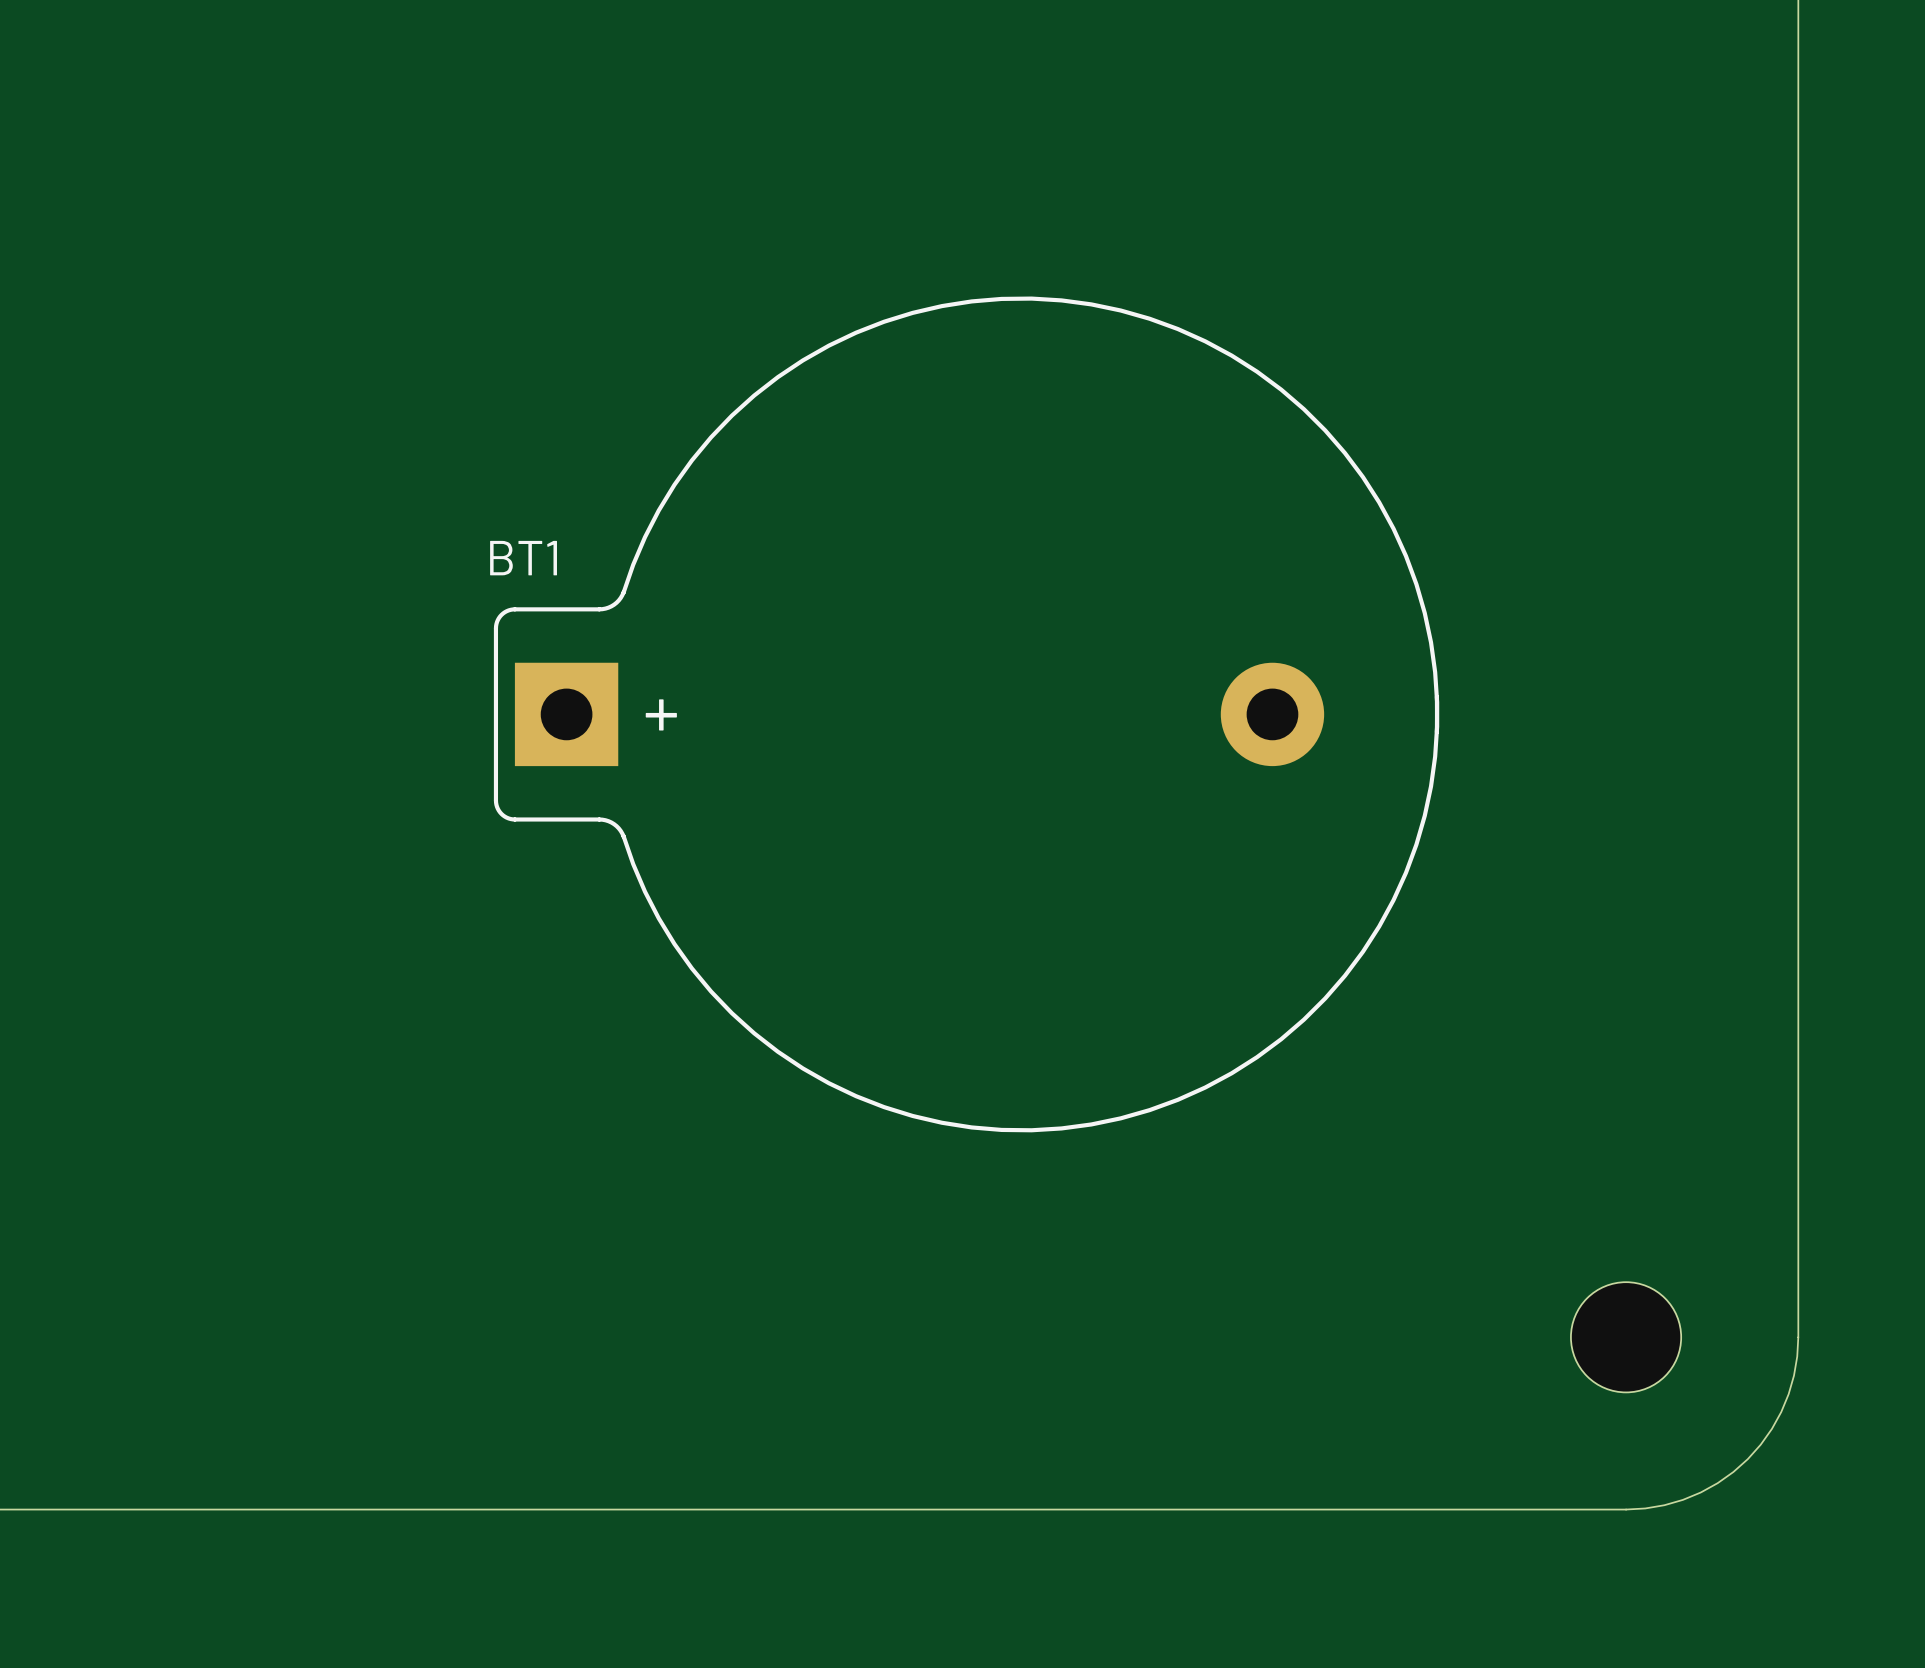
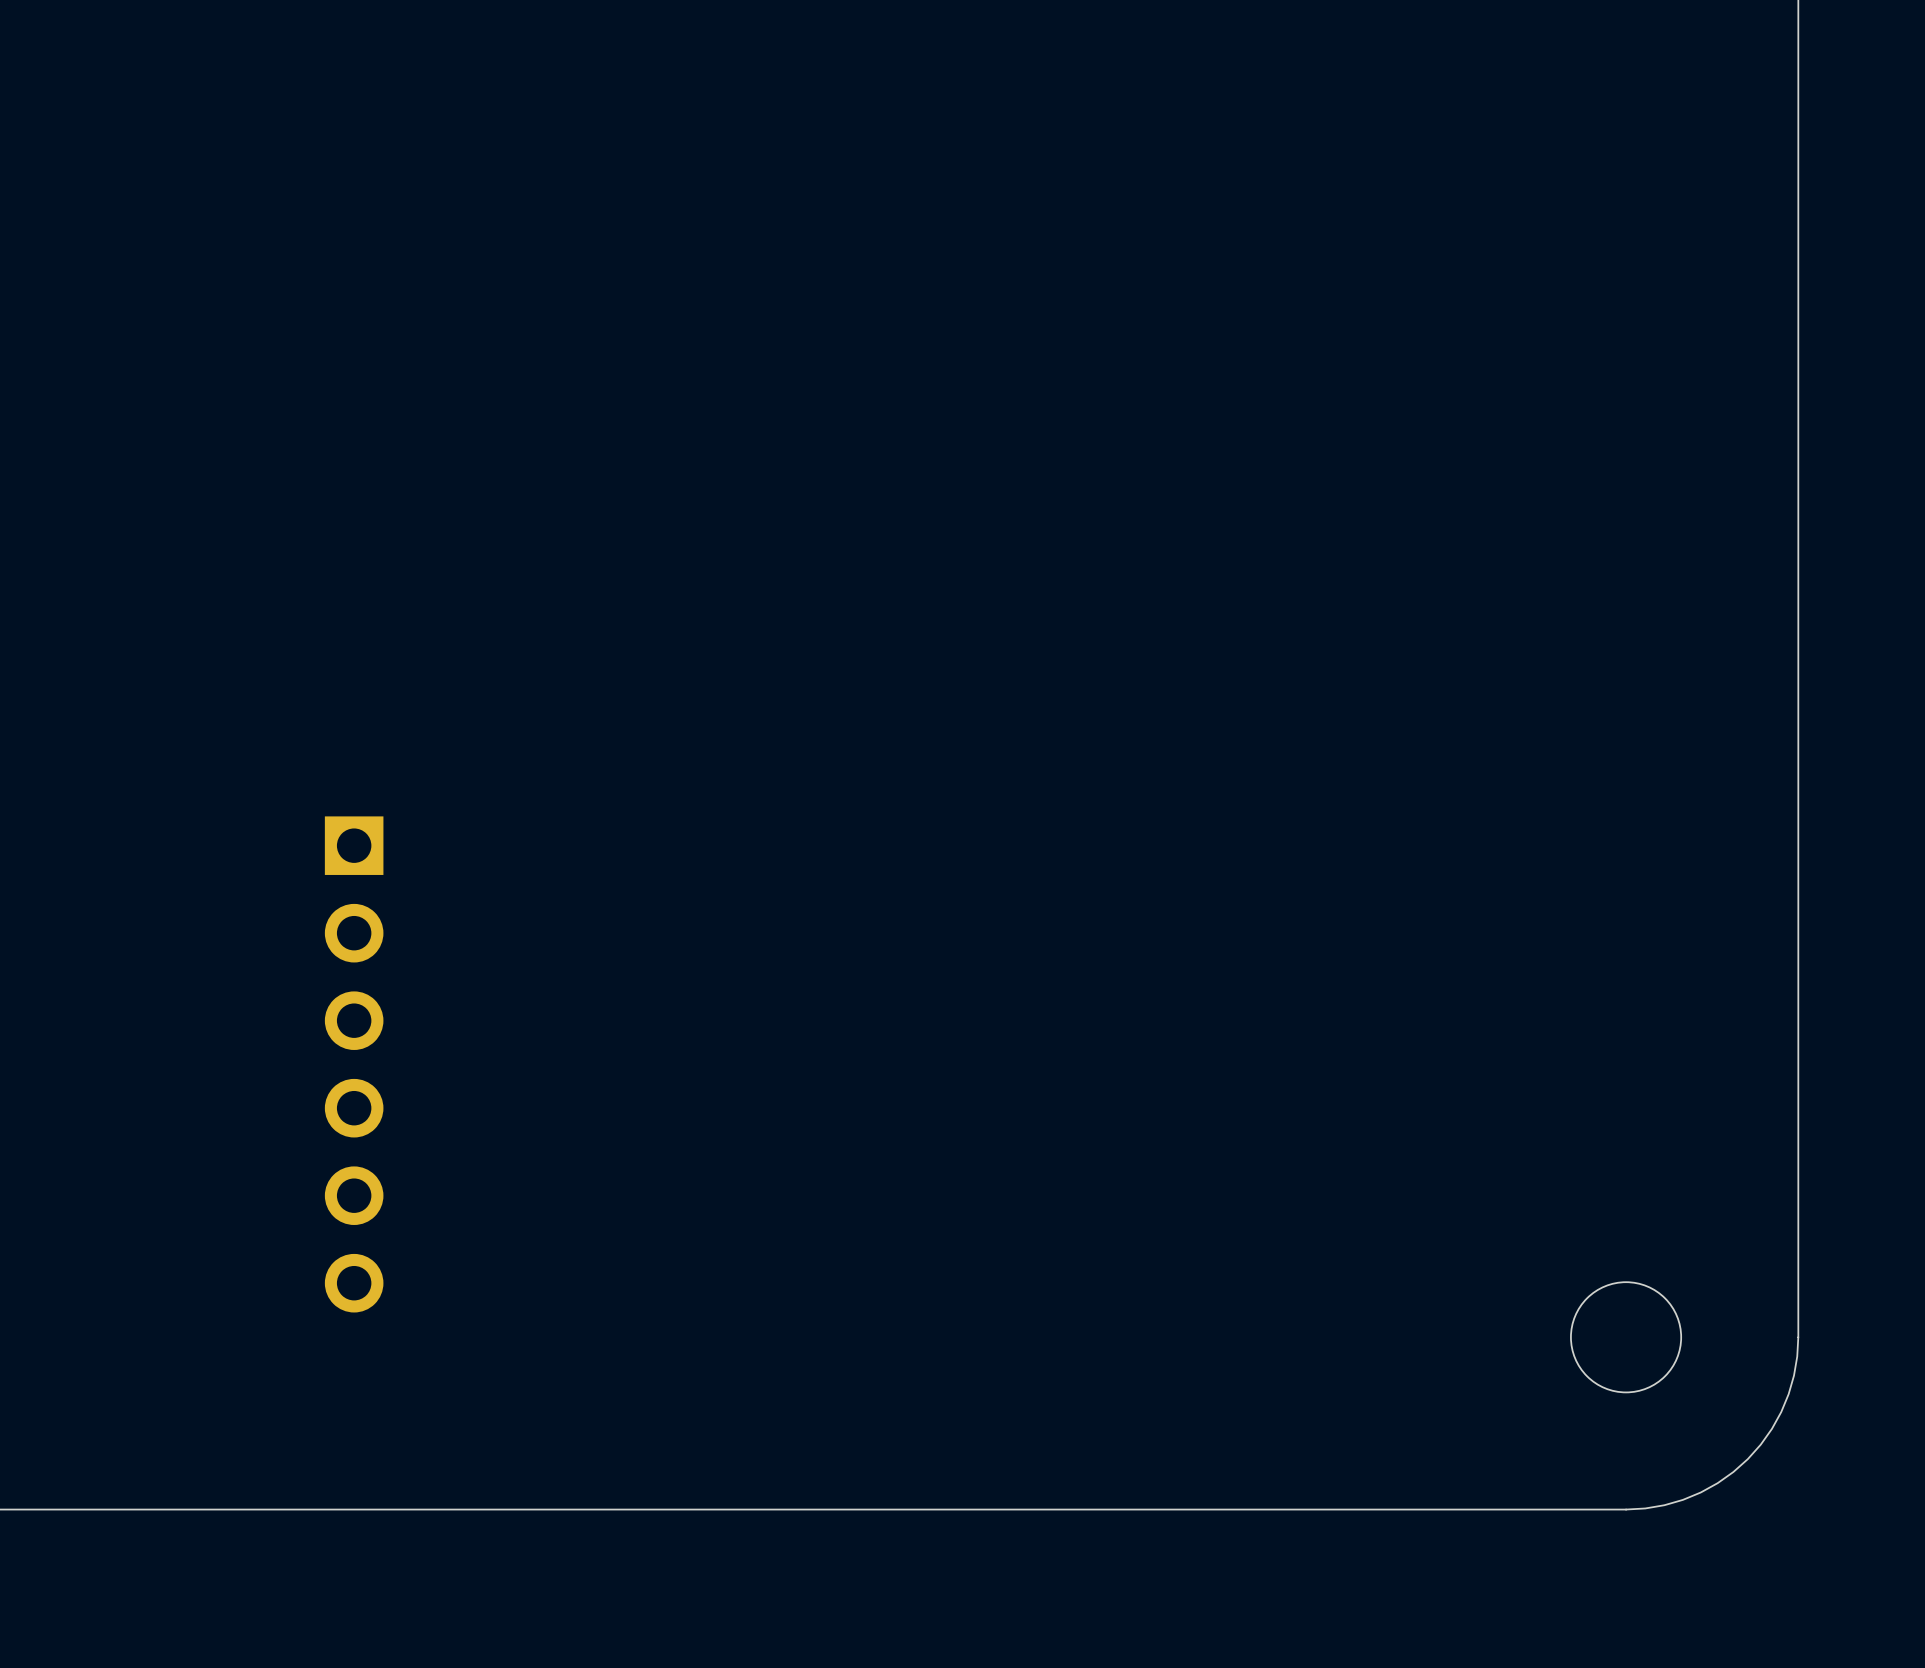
BT1: (966, 714) -> none
part: none -> (354, 1064)

